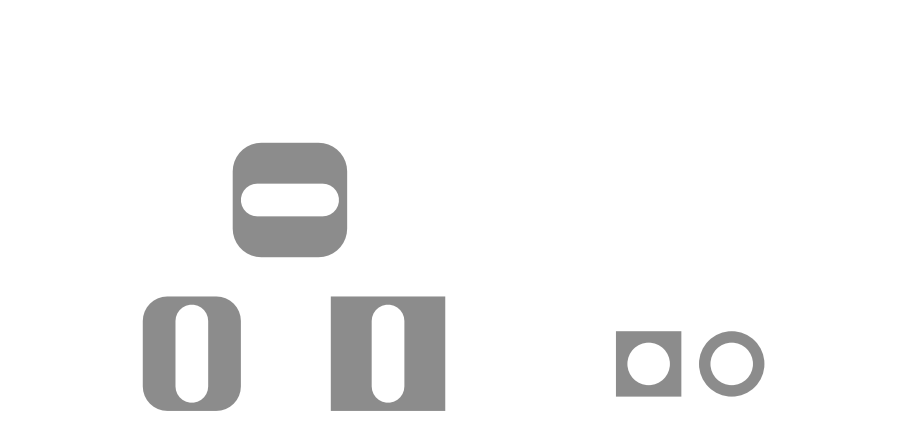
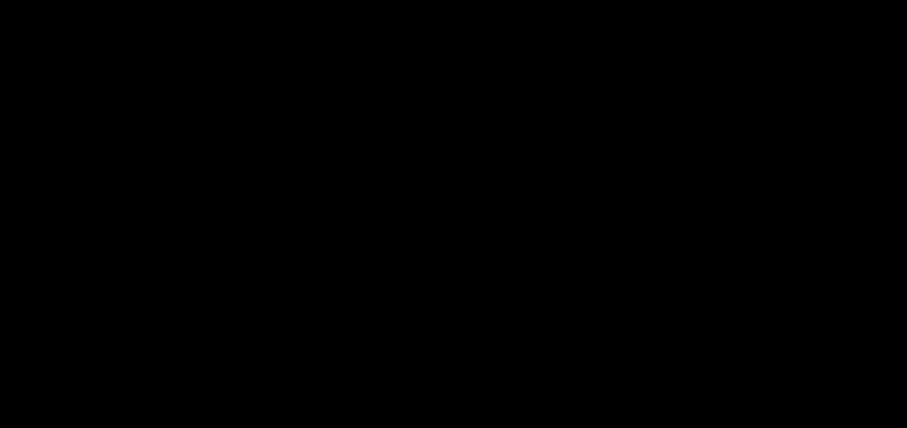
part: (294, 276) -> none
part: (690, 363) -> none

